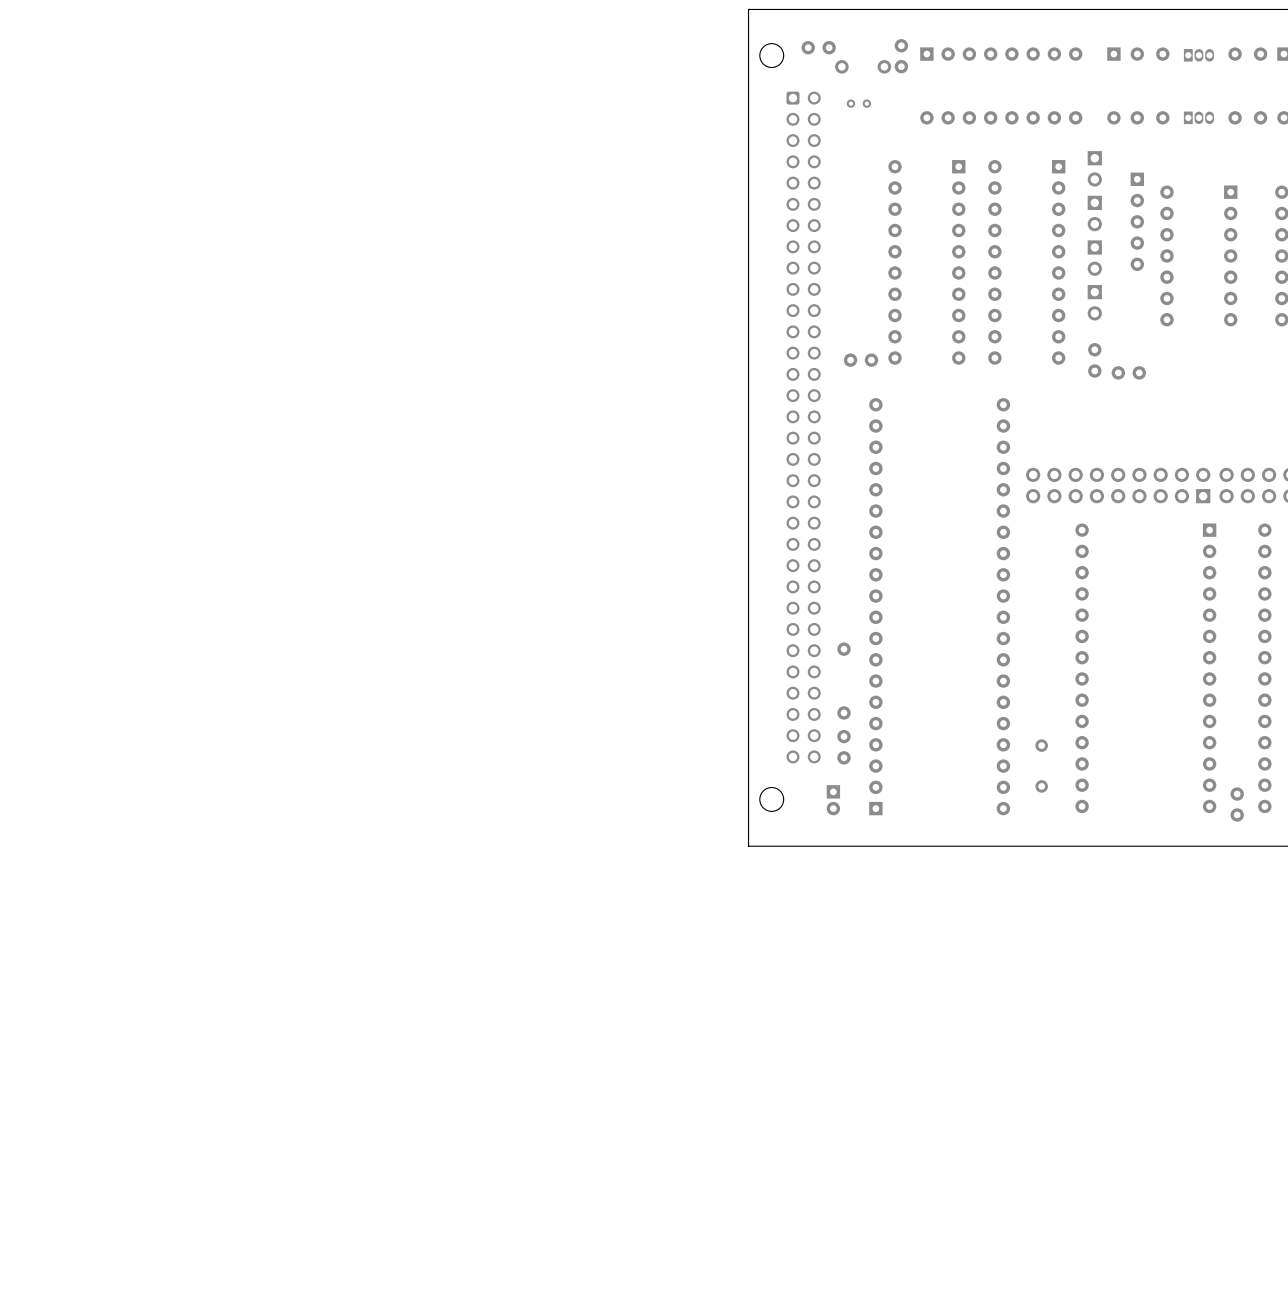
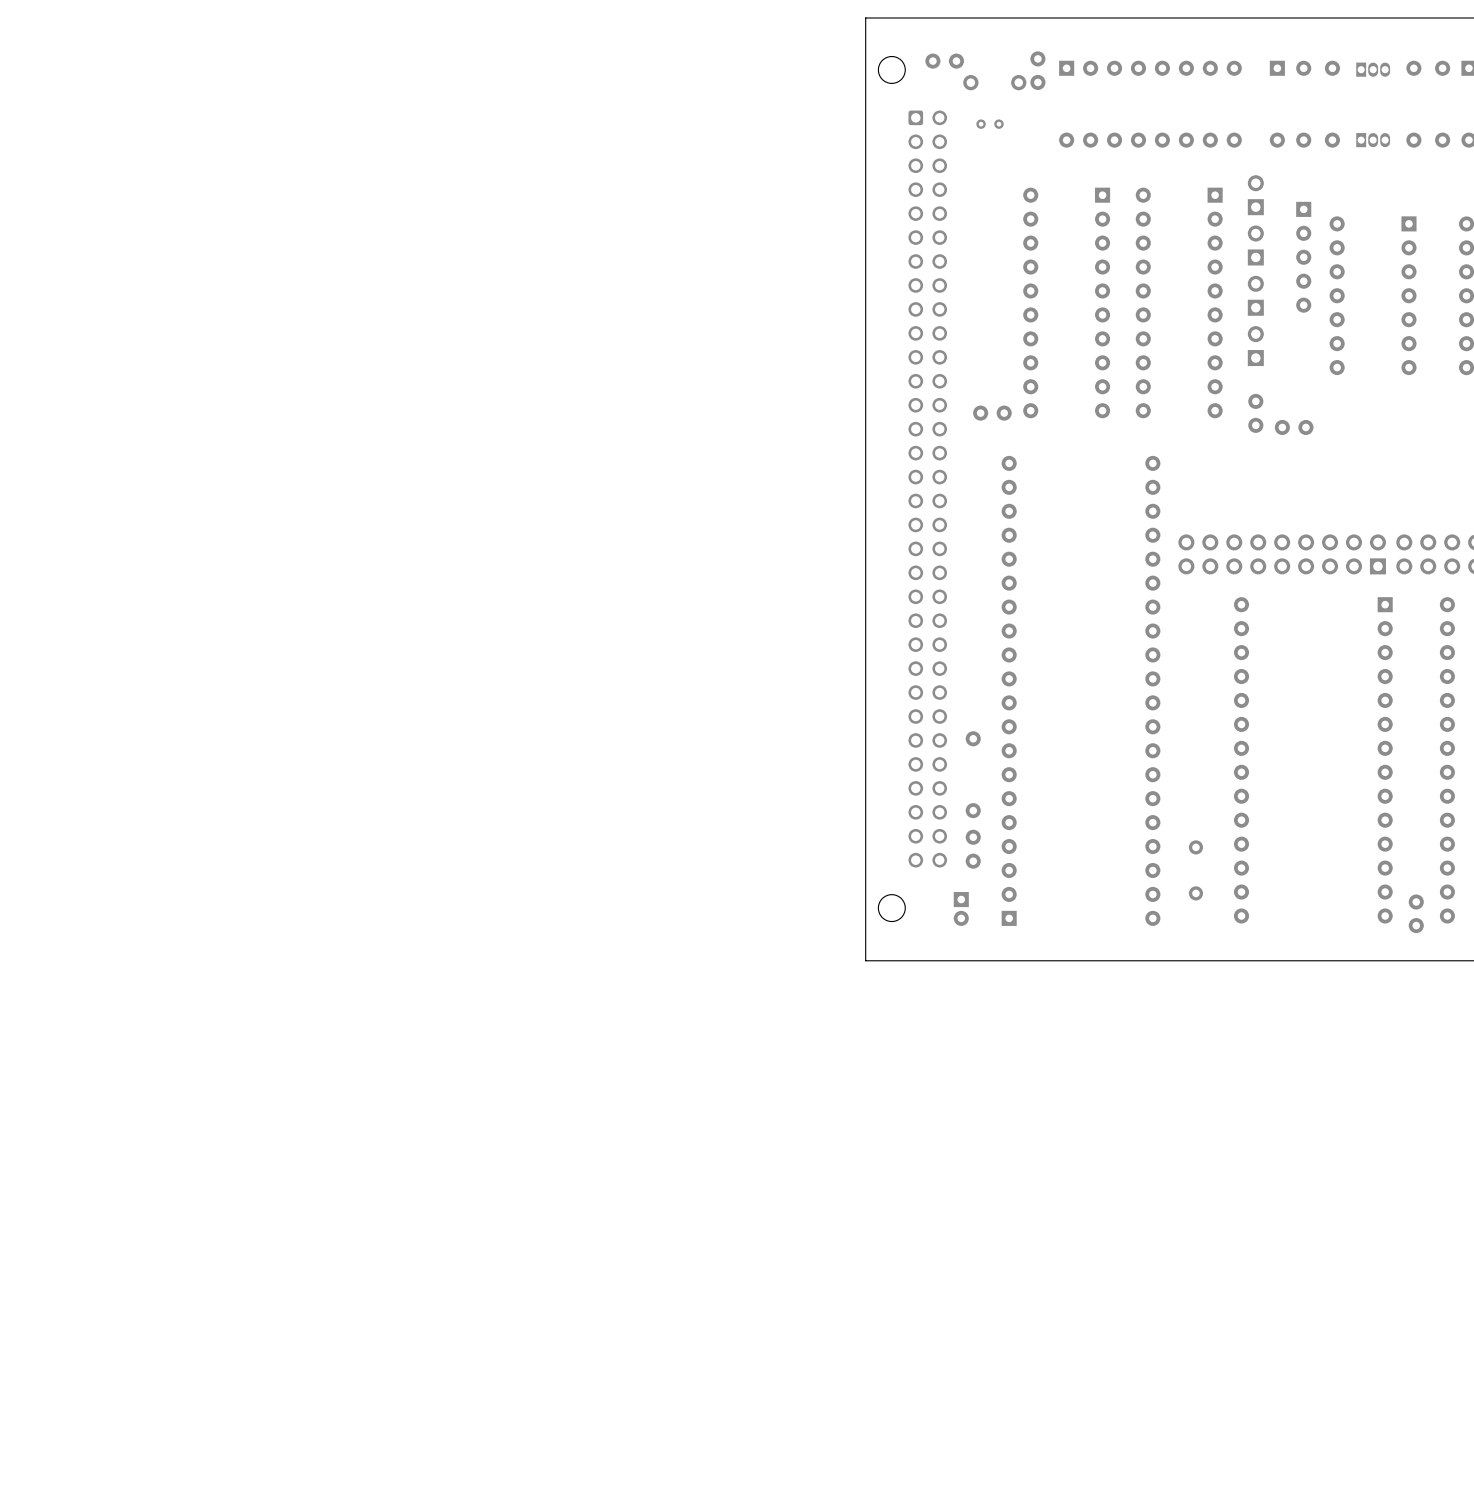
part rotation: 0° (1094, 168) -> 180° (1255, 195)
part rotation: 0° (1094, 213) -> 180° (1255, 245)
part rotation: 0° (1094, 258) -> 180° (1255, 295)
part rotation: 0° (1094, 302) -> 180° (1255, 346)

